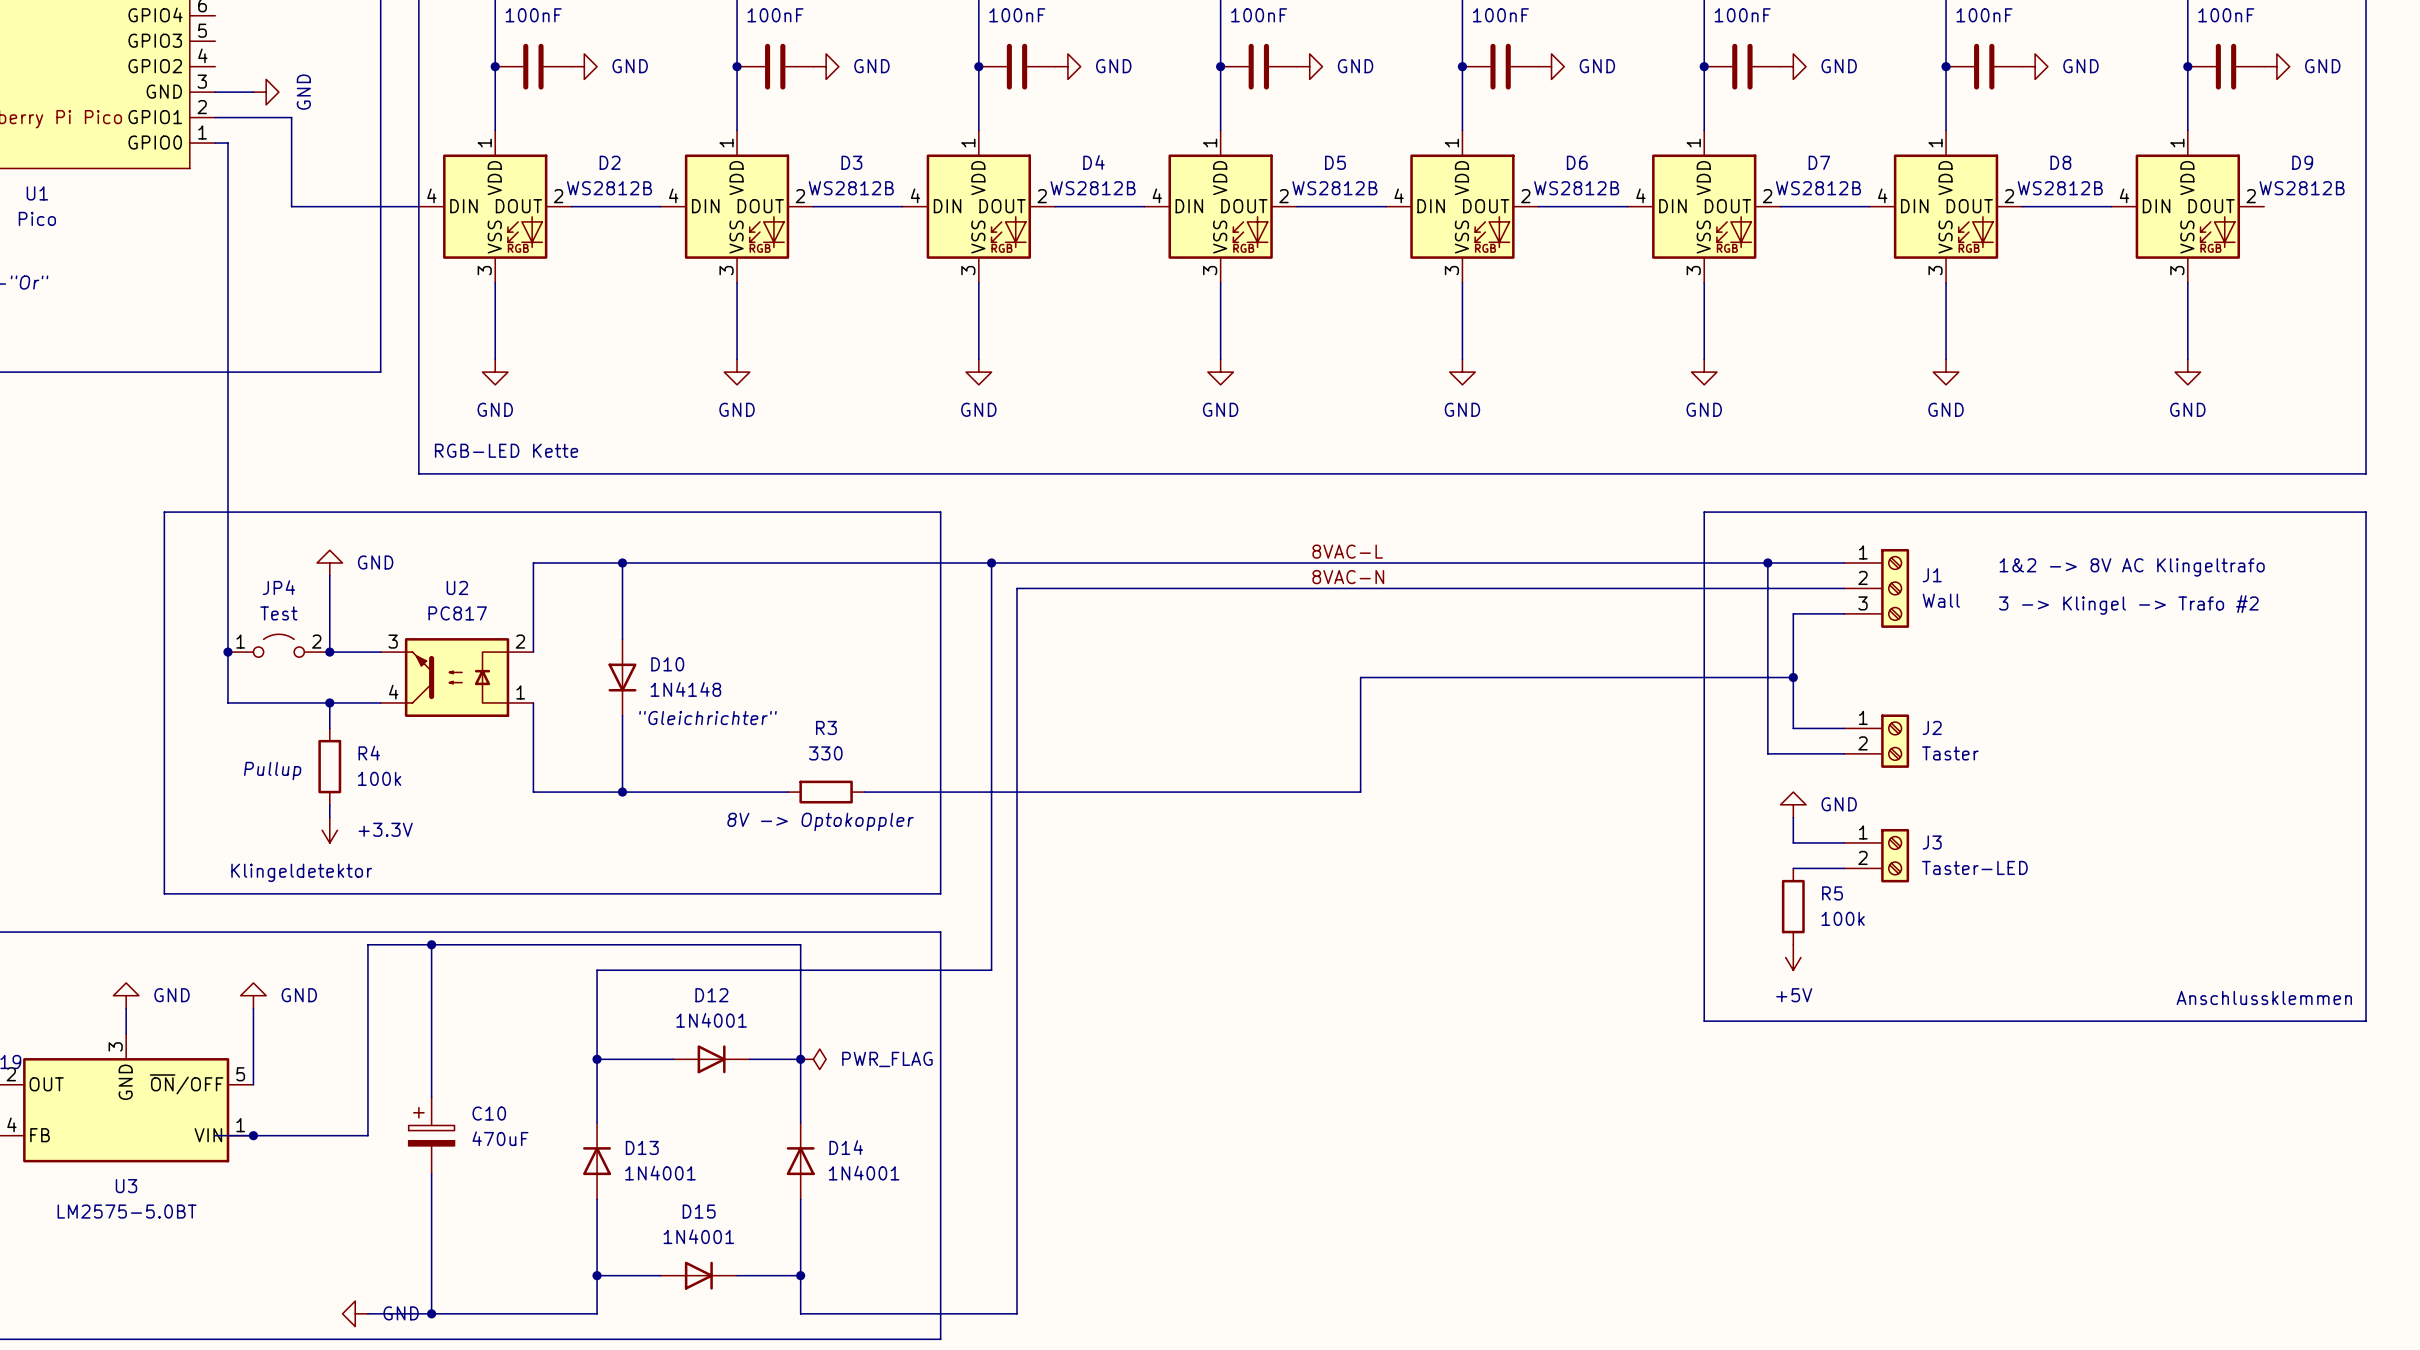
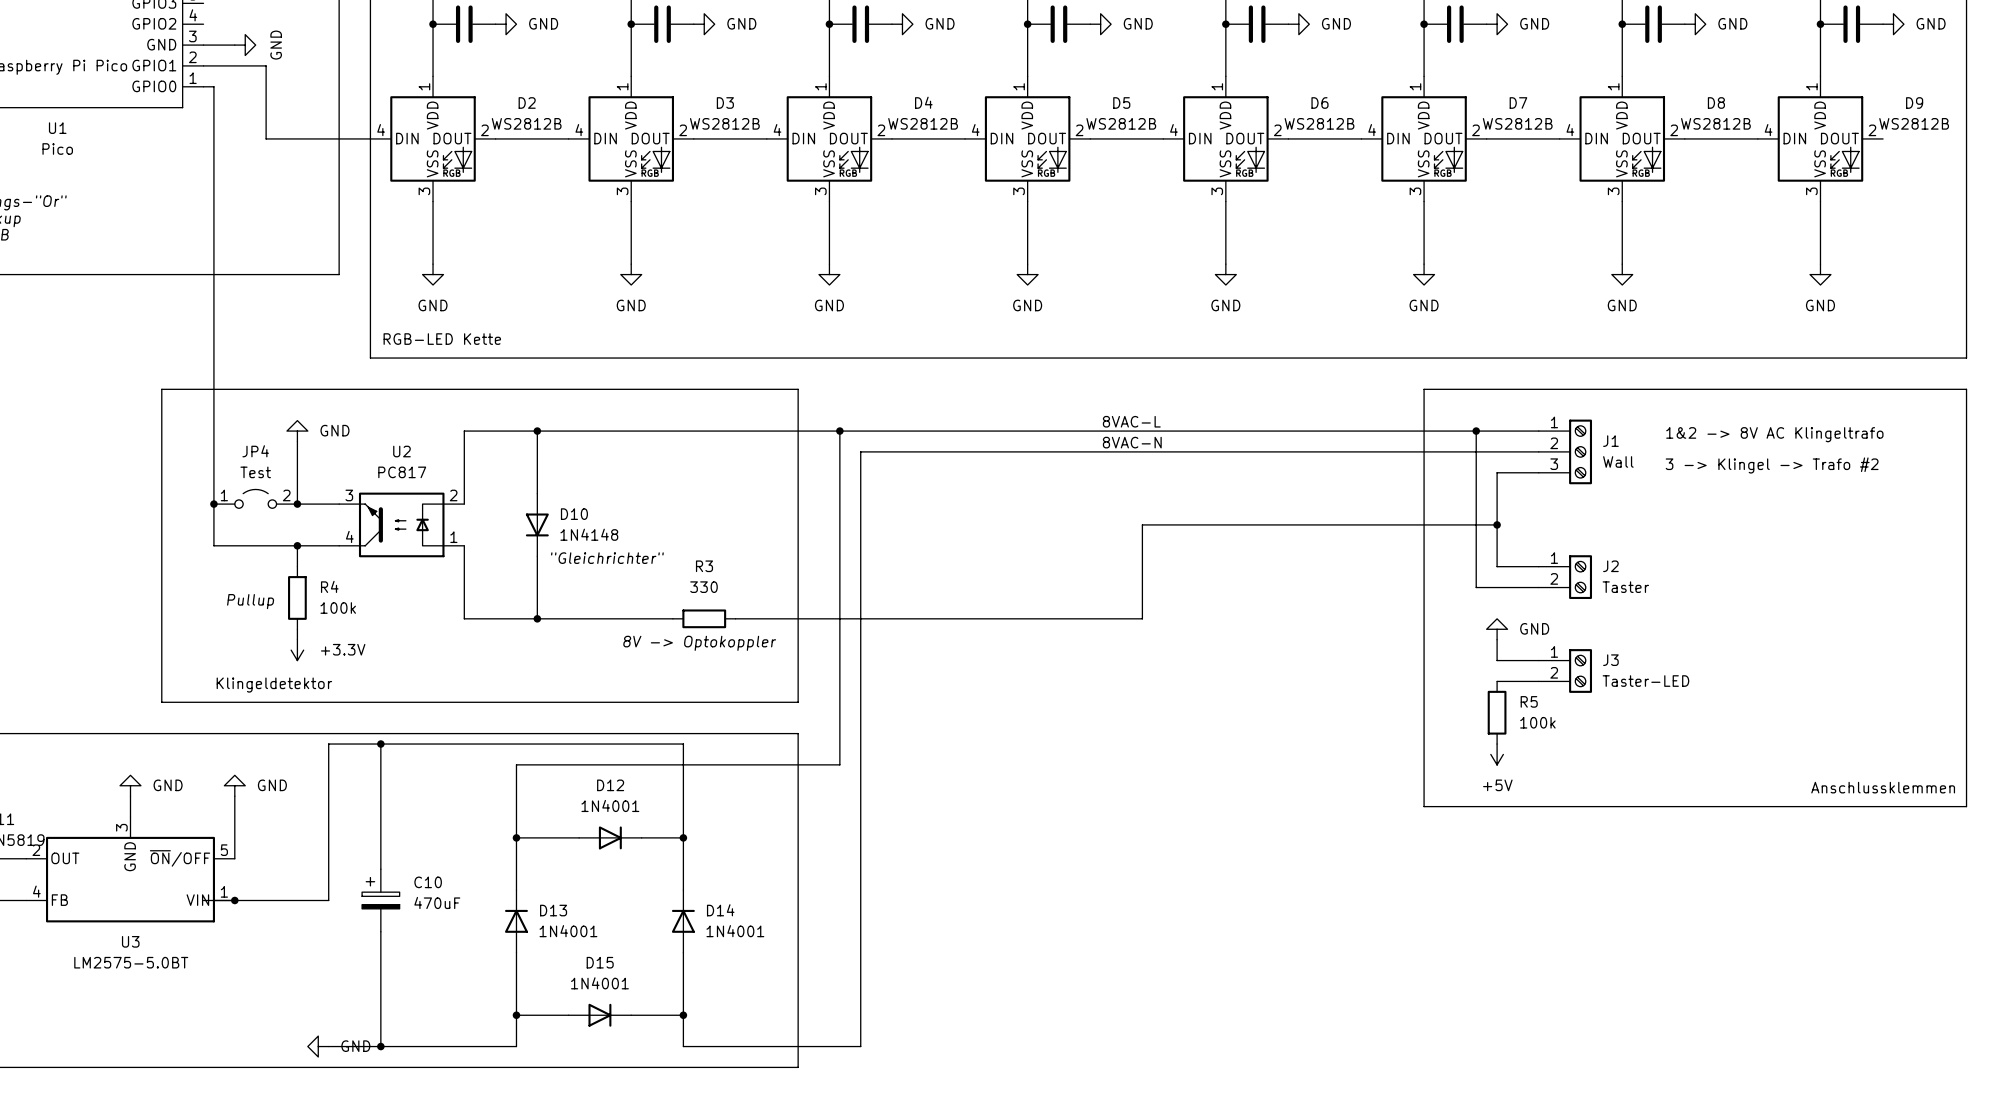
power symbol: PWR_FLAG (813, 1059) -> none

